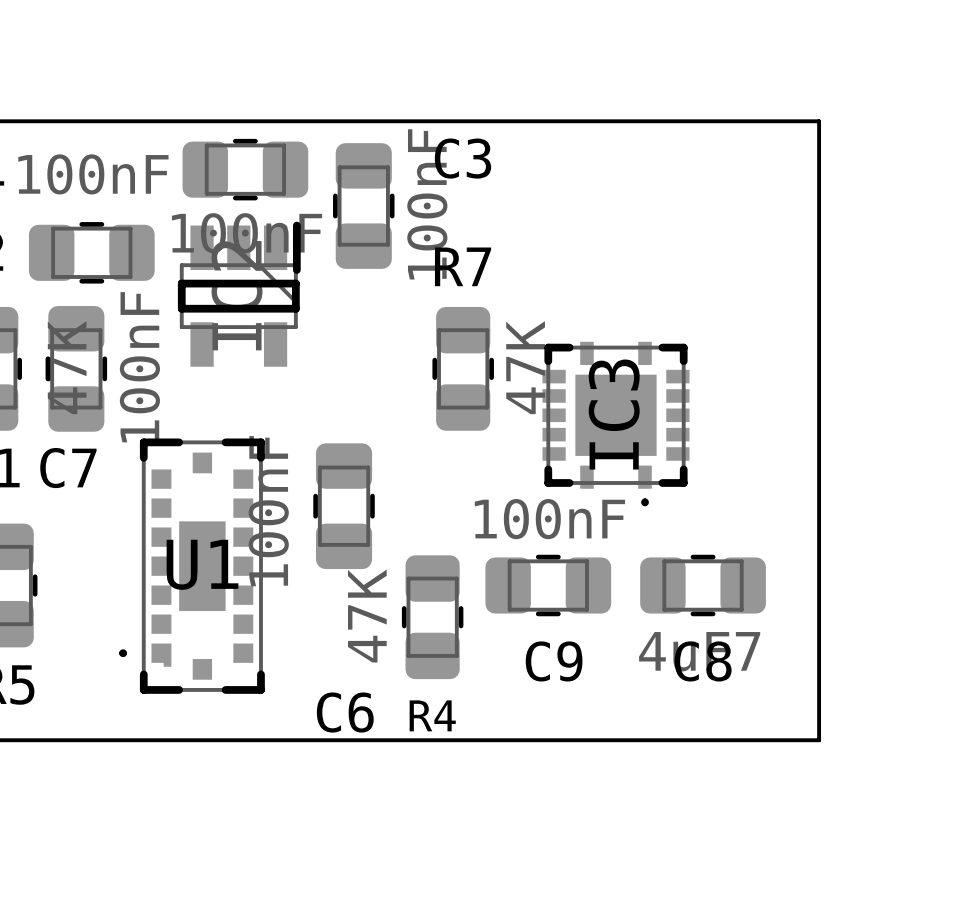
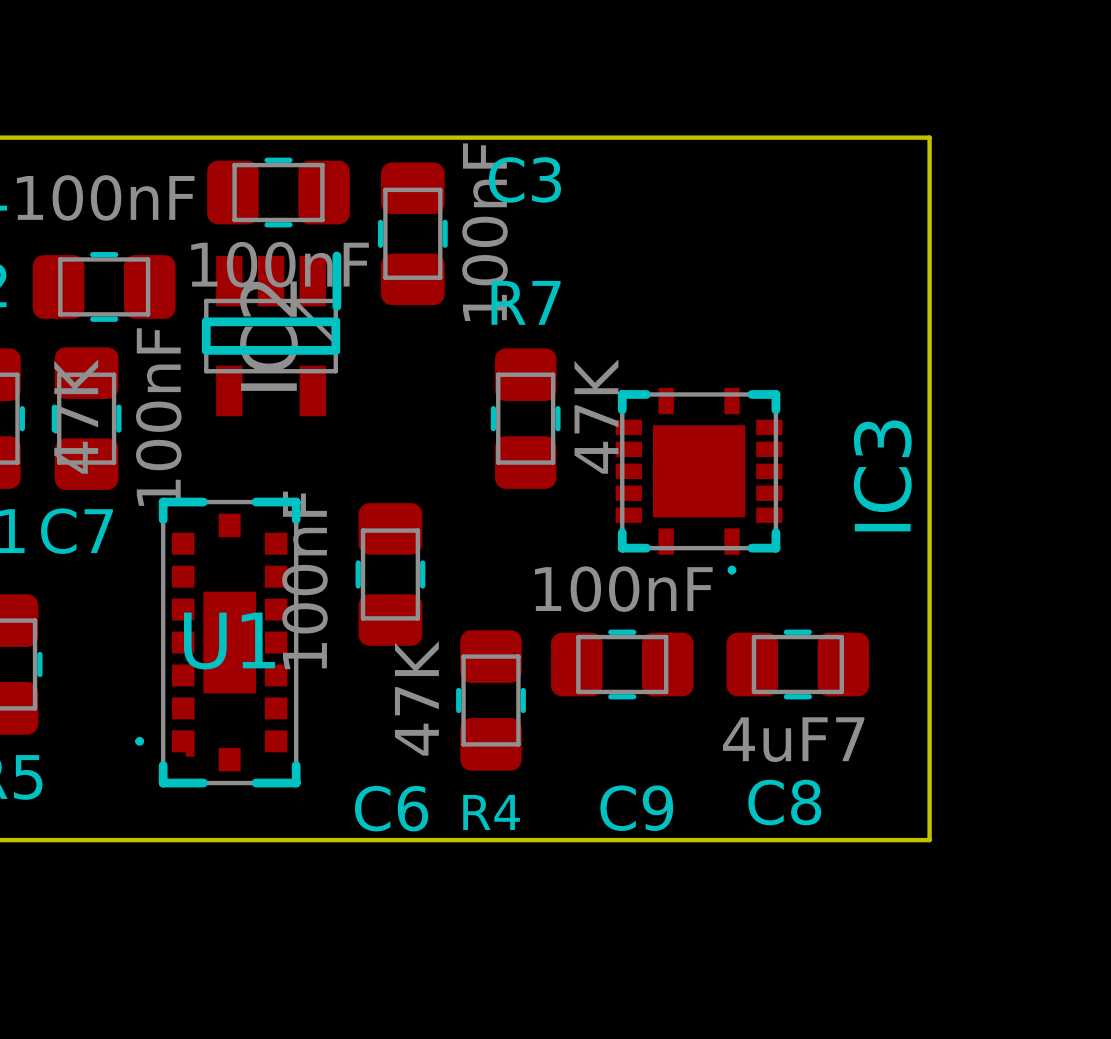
IC3 name position: IC3 (614, 414) -> IC3 (882, 475)
C9 name position: C9 (554, 661) -> C9 (636, 808)
C8 name position: C8 (703, 661) -> C8 (784, 802)

